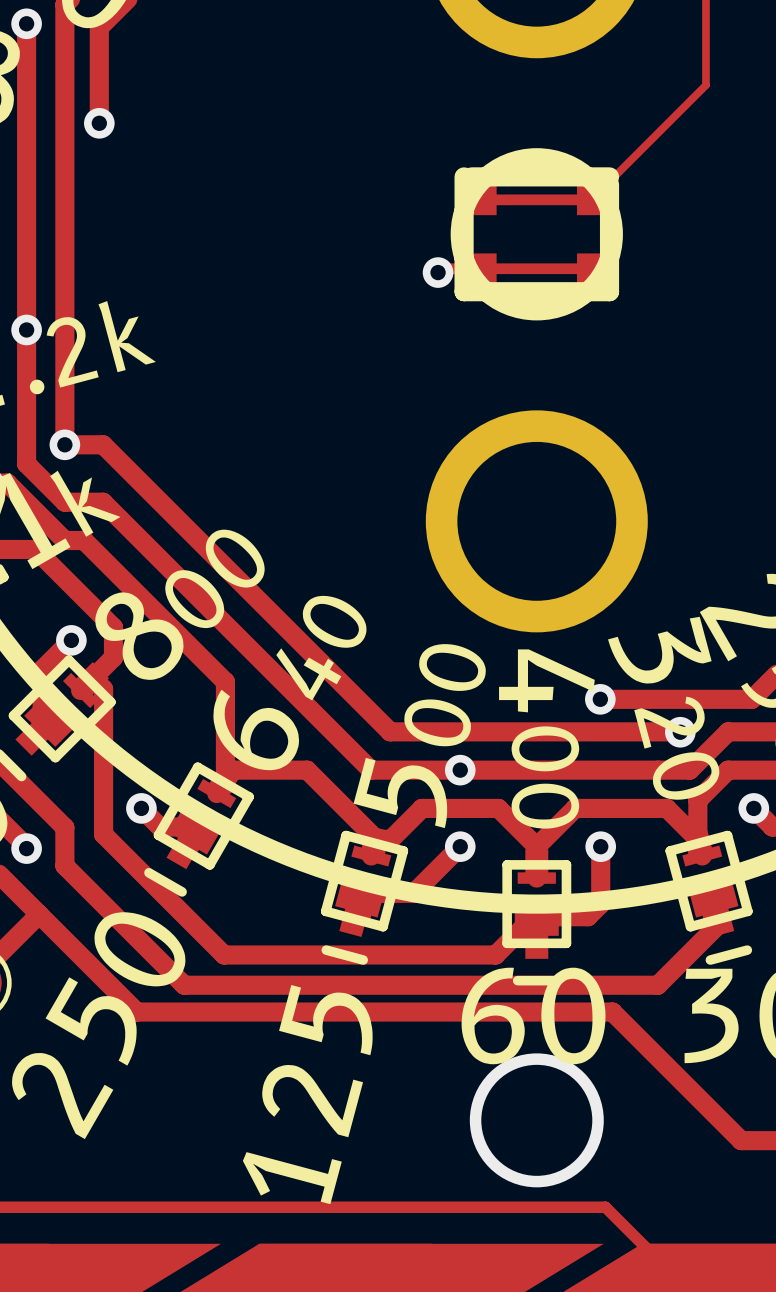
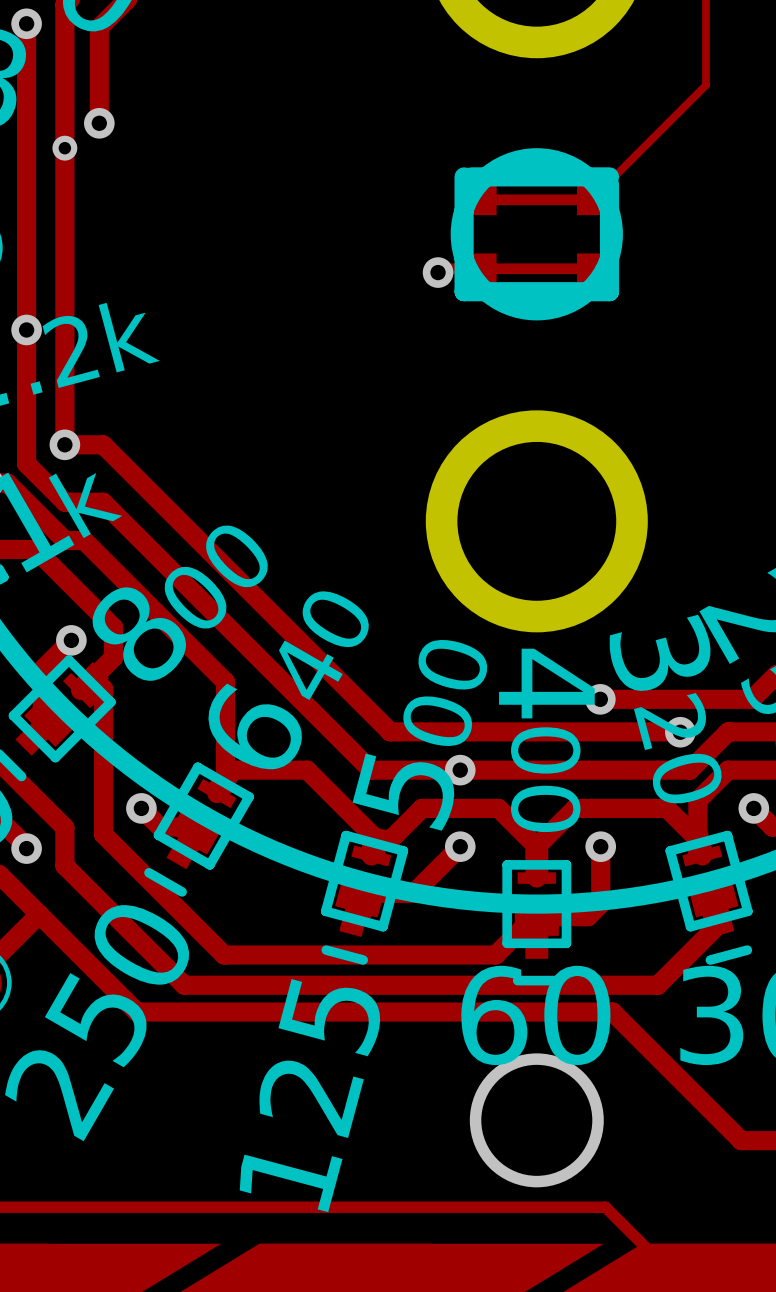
via: none -> (64, 148)

